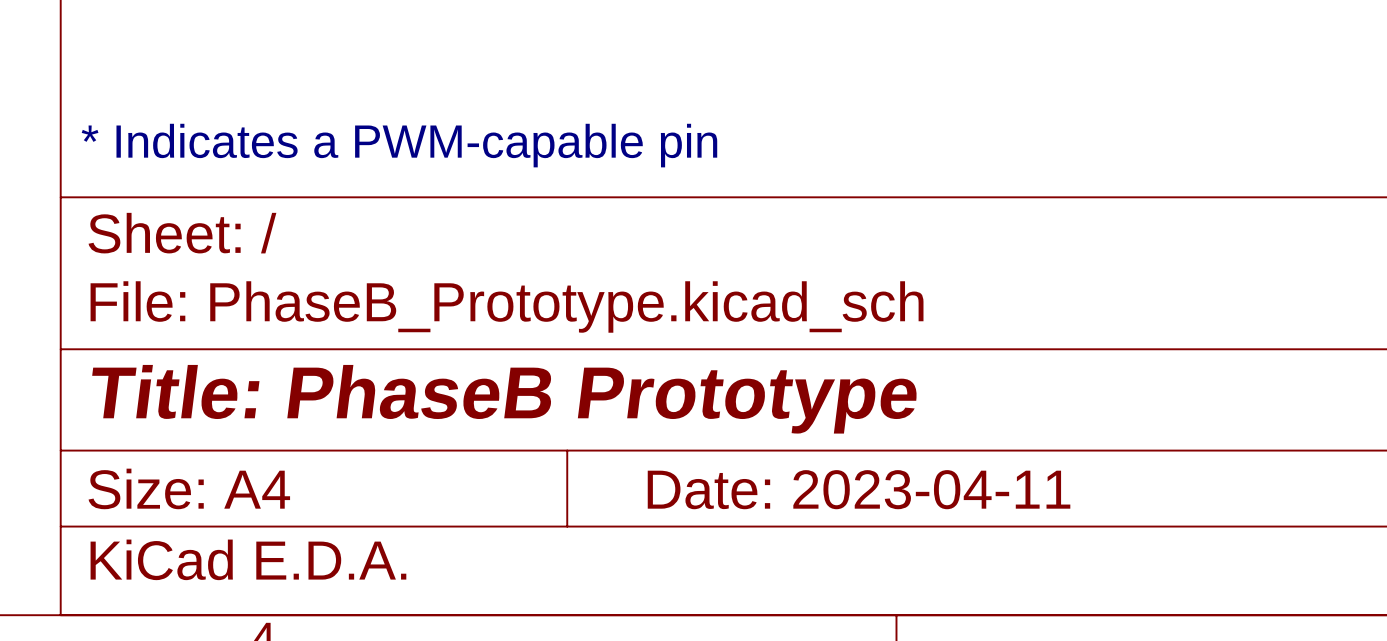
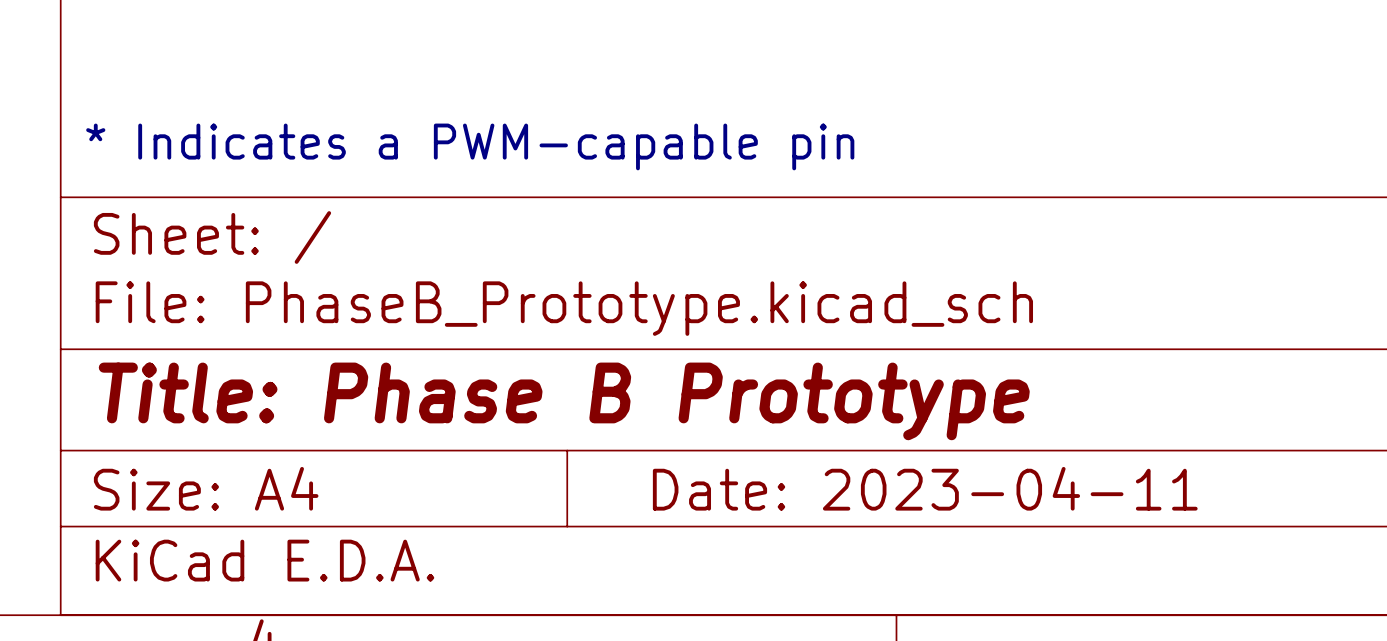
title block: Title: PhaseB Prototype (504, 399) -> Title: Phase B Prototype (564, 401)

